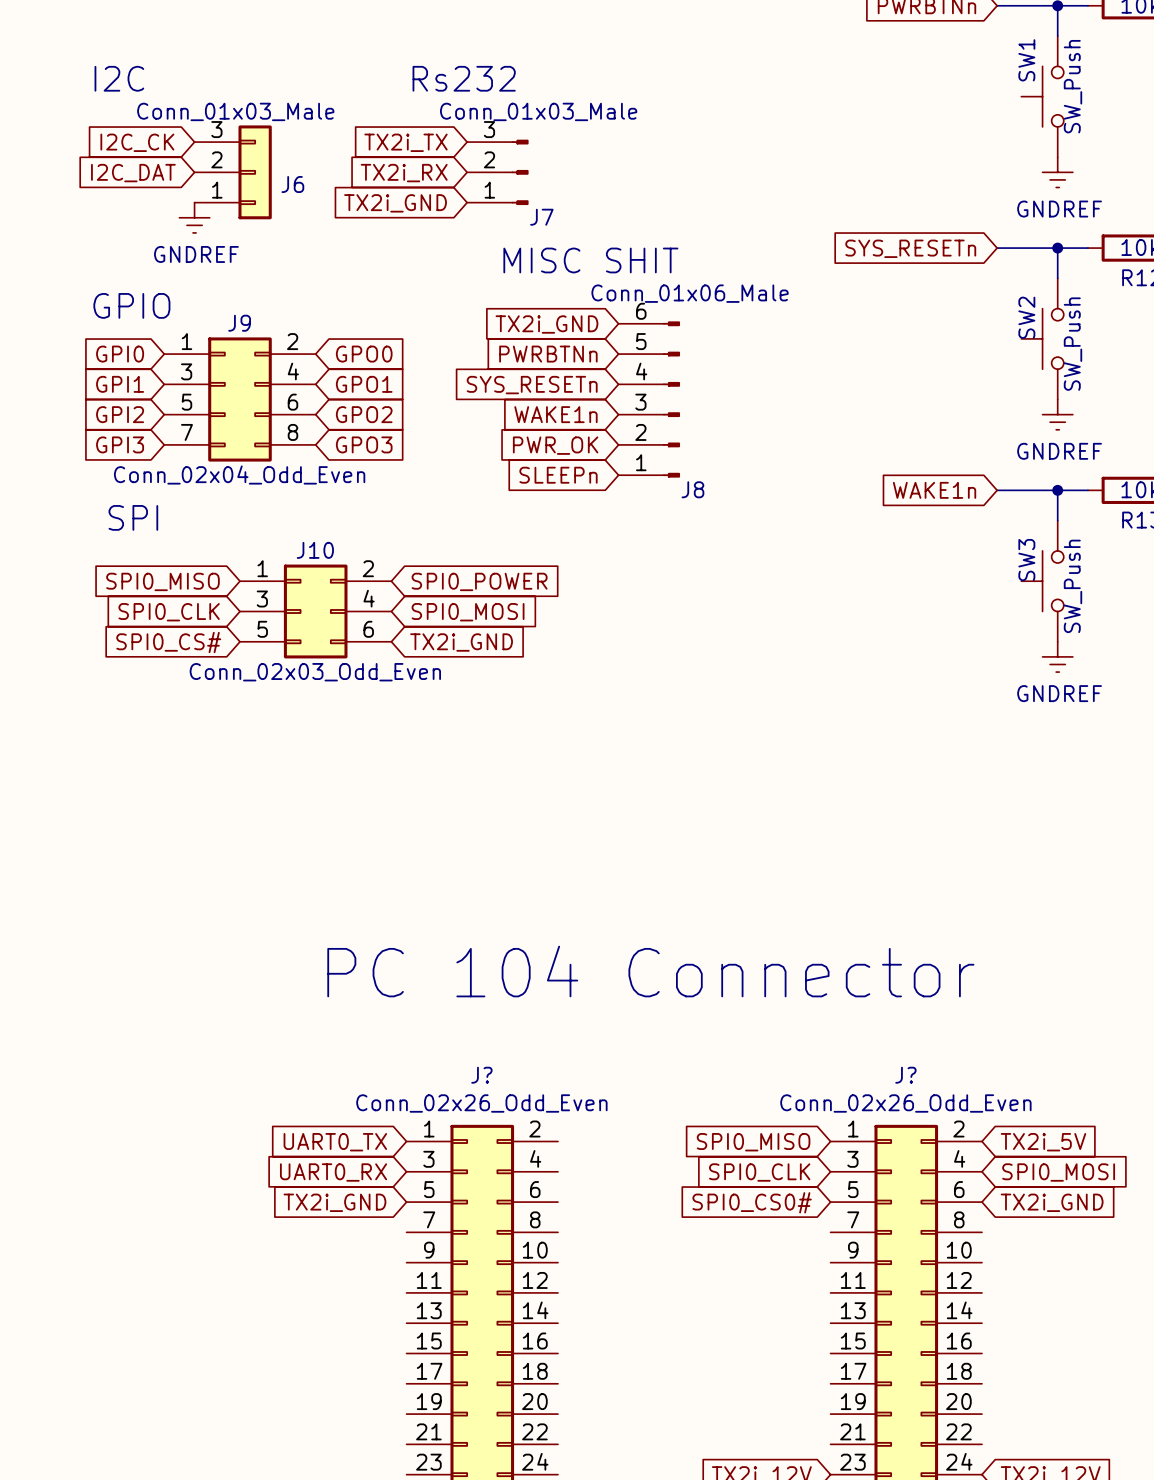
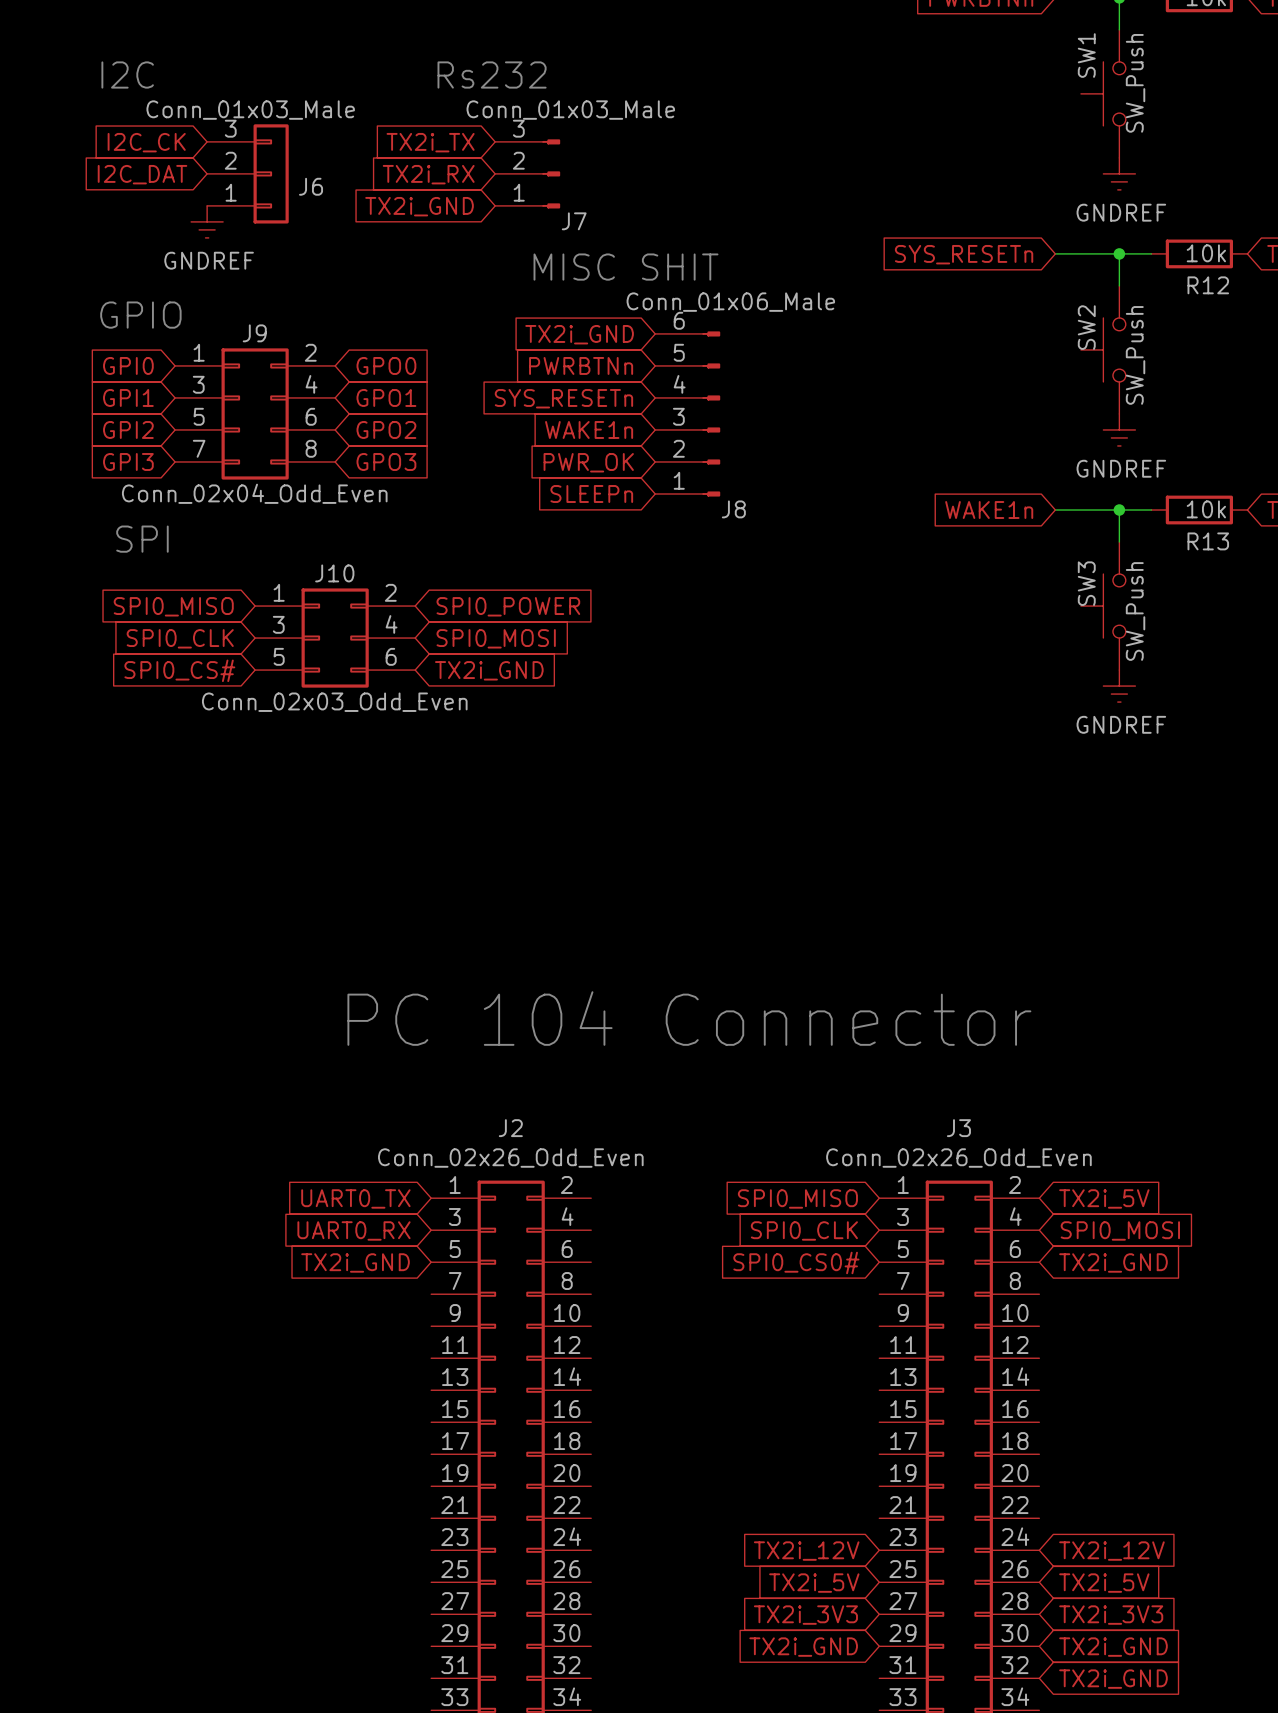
J? name: J? (481, 1075) -> J2 (510, 1128)
J? name: J? (905, 1075) -> J3 (958, 1128)

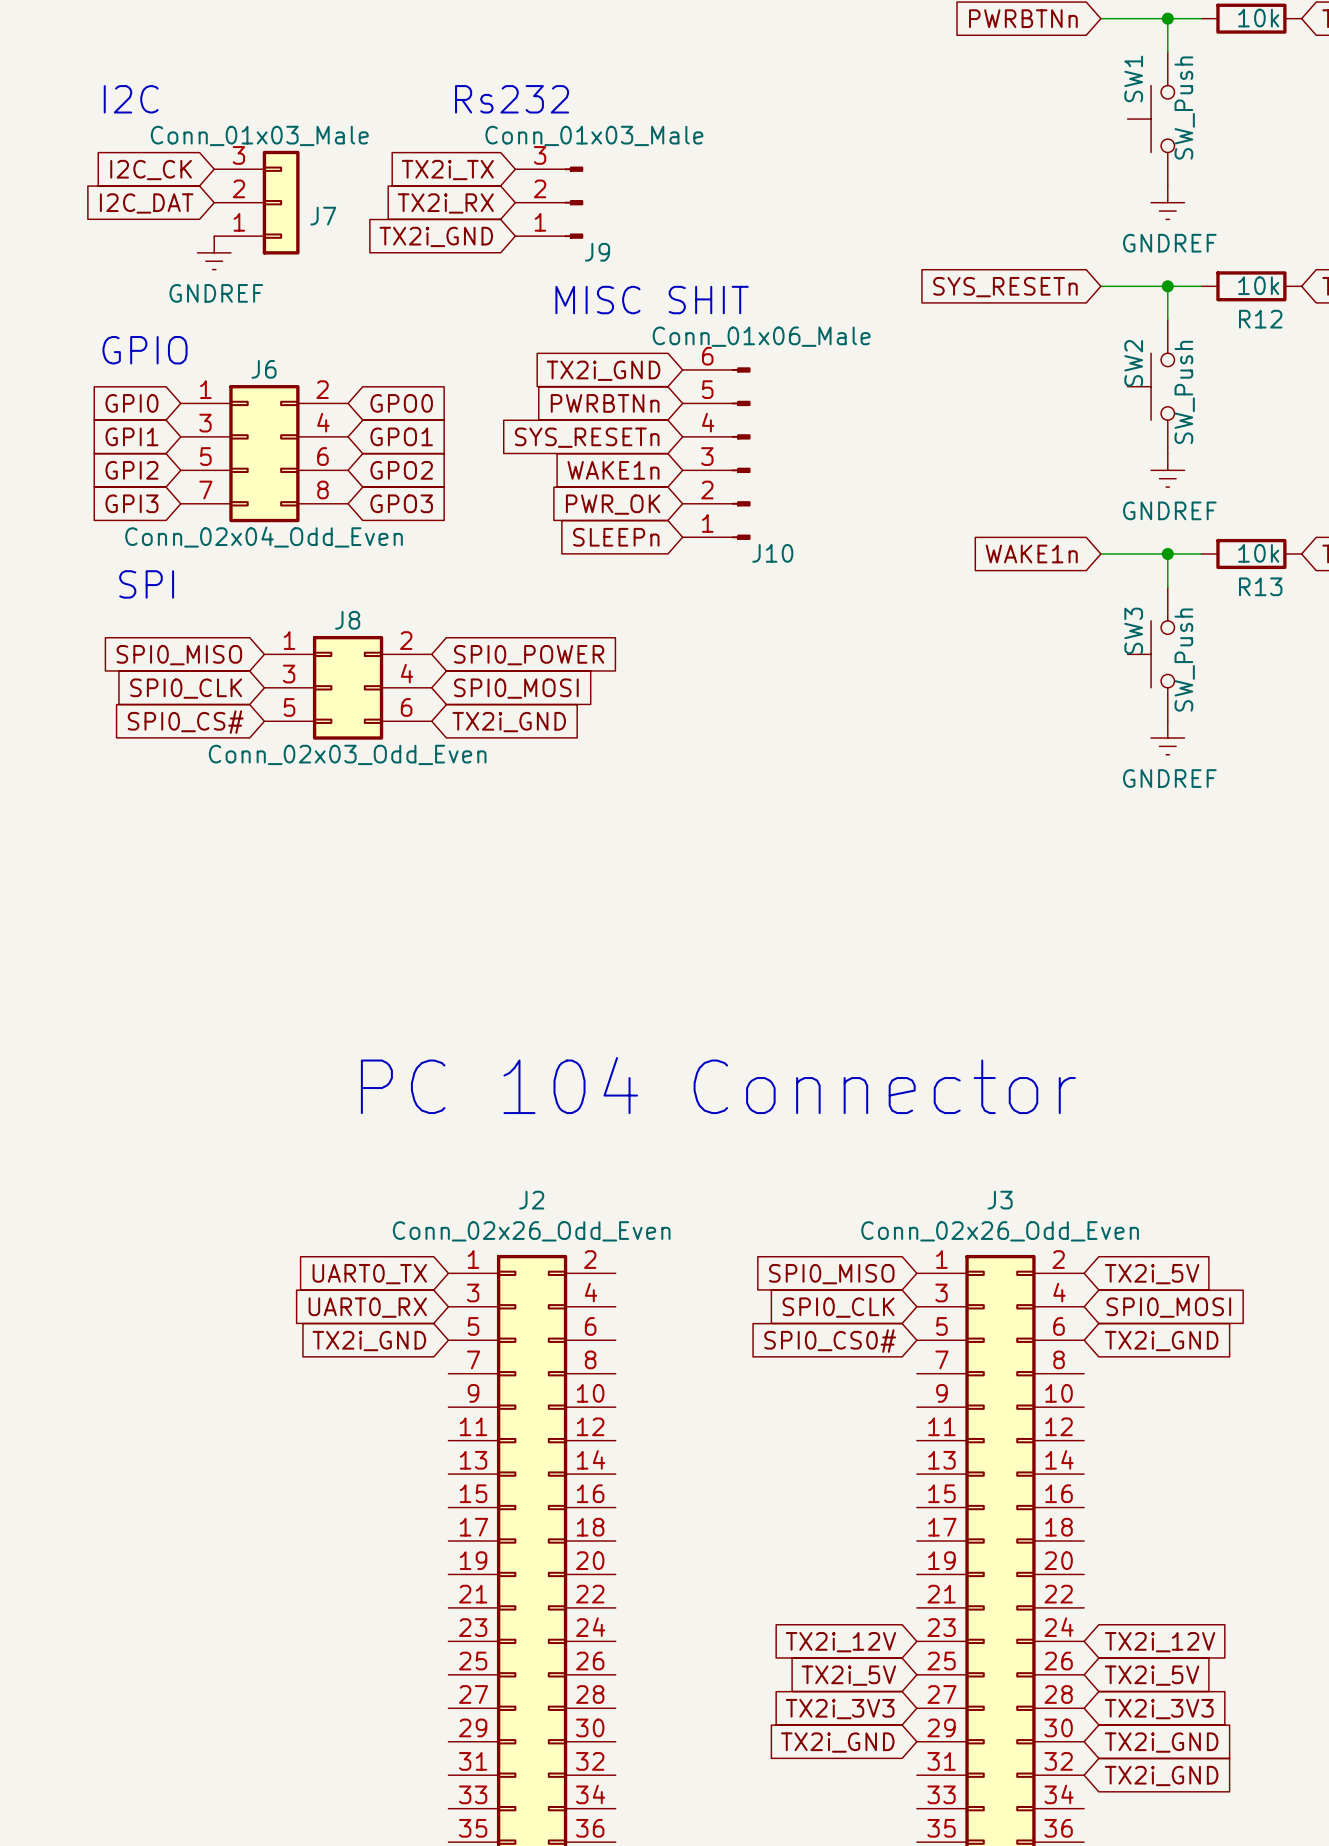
J6 name: J6 (311, 186) -> J7 (323, 216)
J7 name: J7 (574, 221) -> J9 (597, 252)
J9 name: J9 (254, 333) -> J6 (264, 369)
J8 name: J8 (733, 509) -> J10 (772, 553)
J10 name: J10 (334, 573) -> J8 (347, 620)

